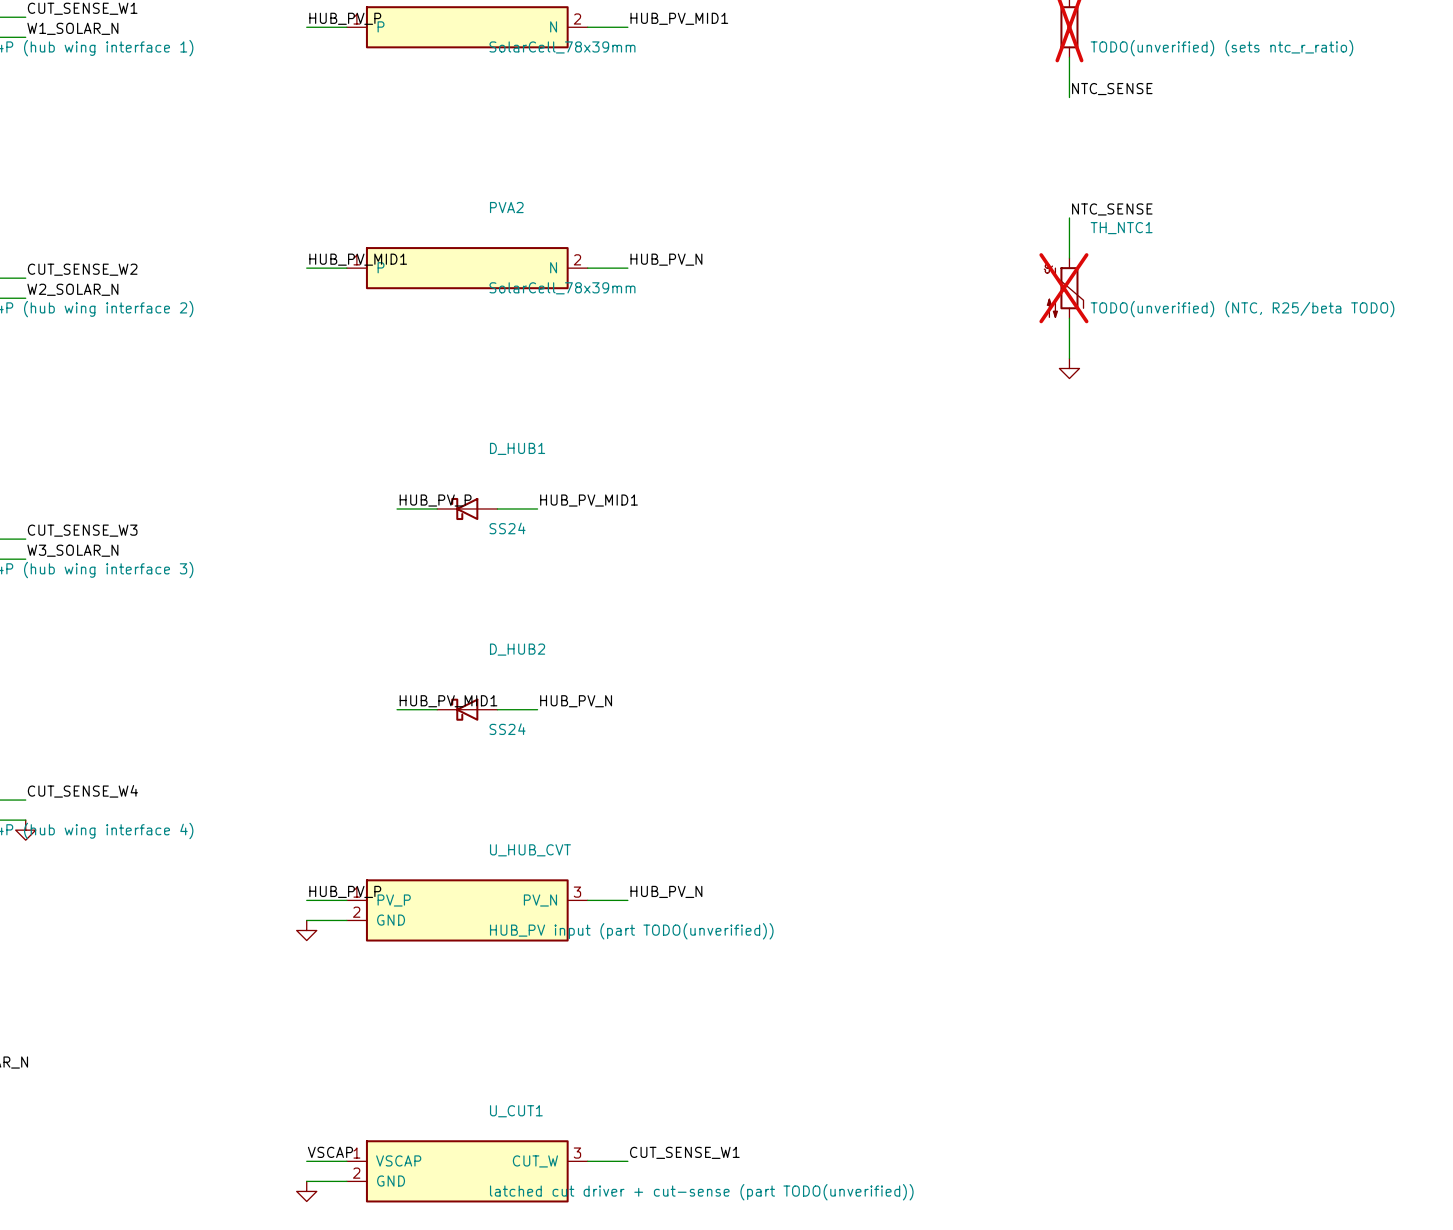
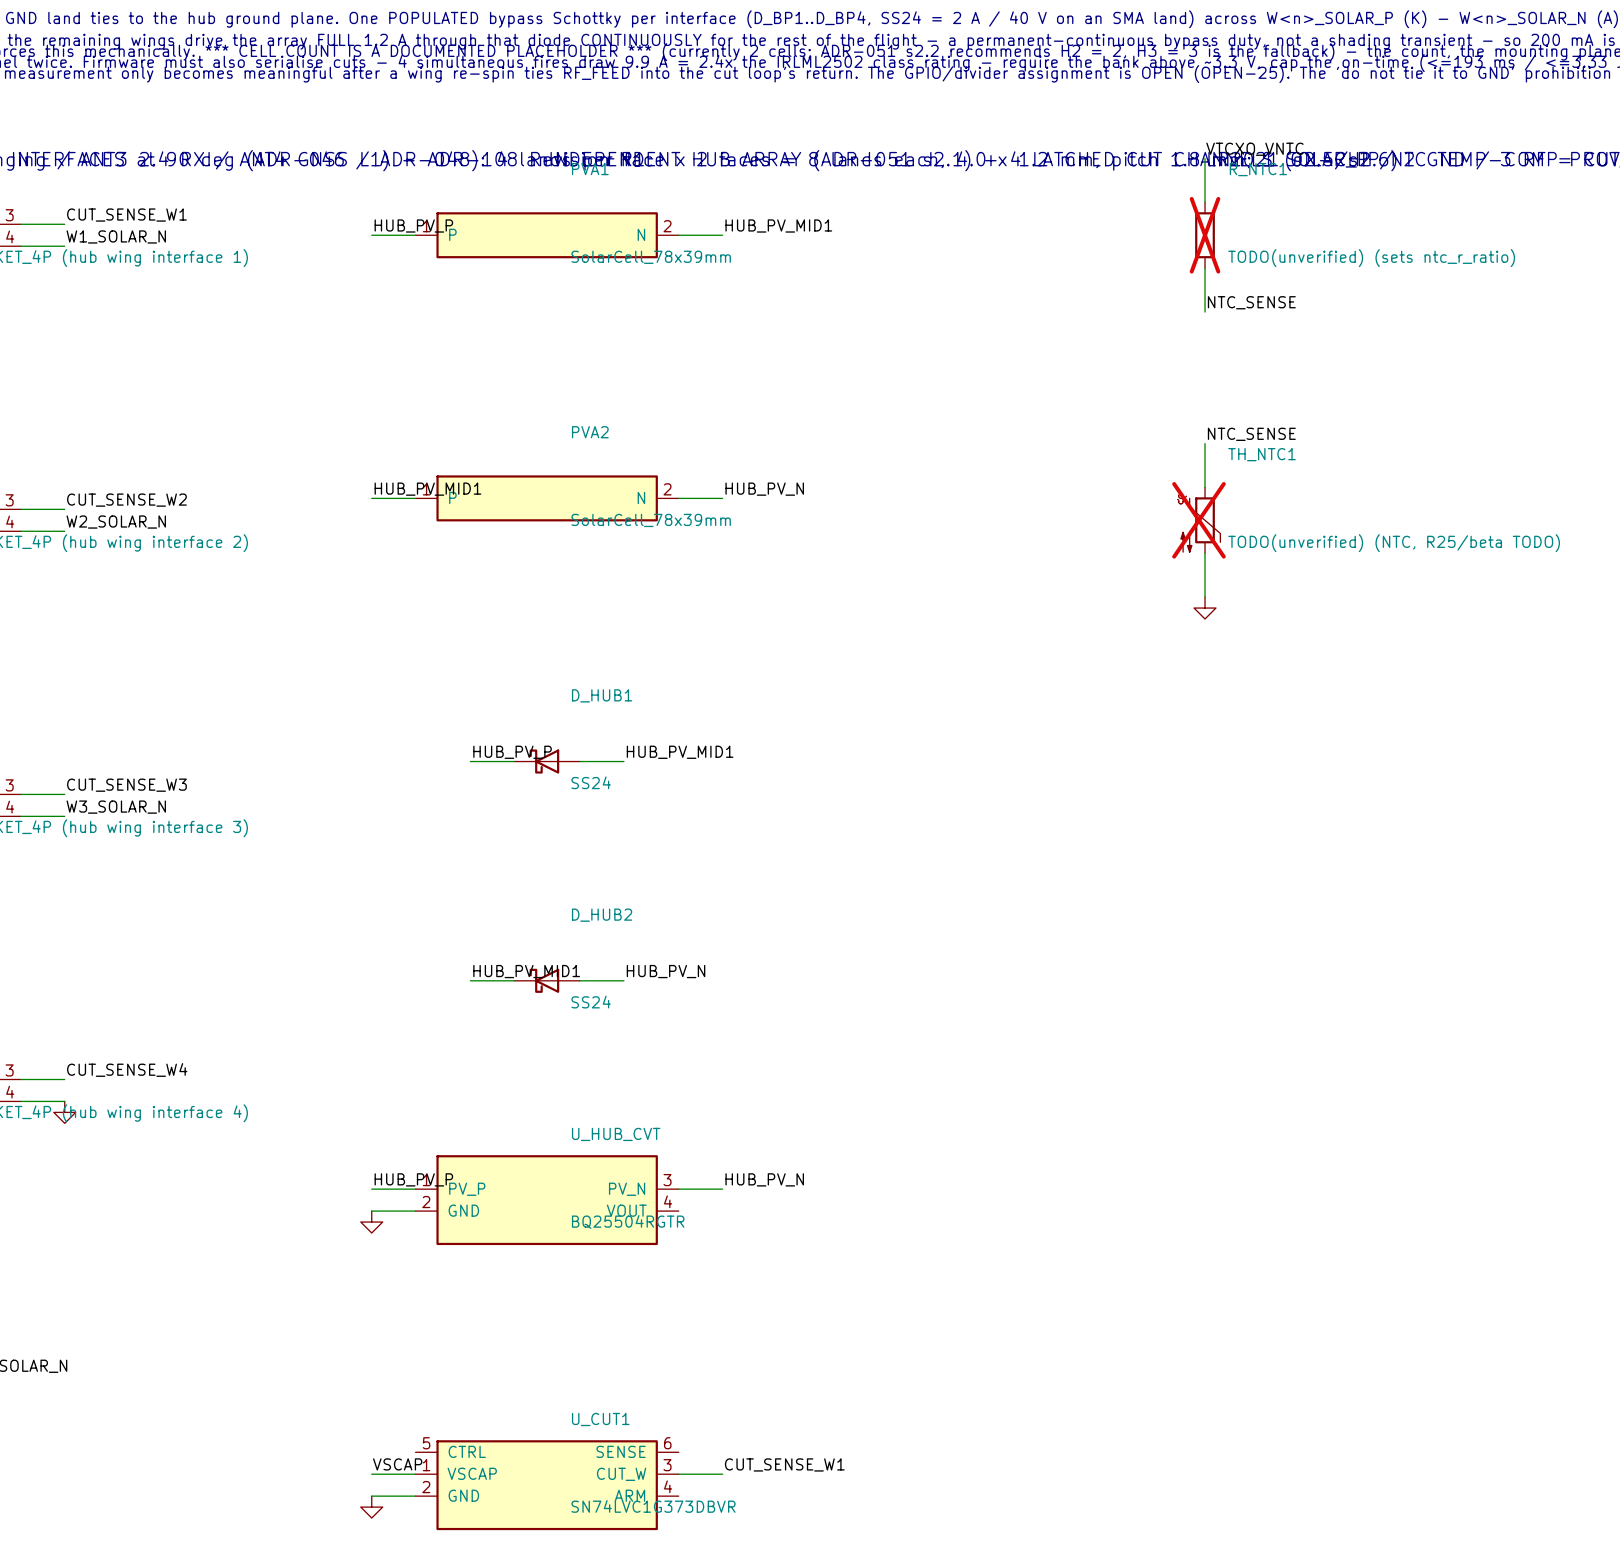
U_HUB_CVT symbol: [346, 879, 588, 942] -> [415, 1155, 679, 1246]
U_HUB_CVT value: HUB_PV input (part TODO(unverified)) (631, 931) -> BQ25504RGTR (628, 1221)
U_CUT1 symbol: [346, 1140, 588, 1203] -> [415, 1440, 679, 1531]
U_CUT1 value: latched cut driver + cut-sense (part TODO(unverified)) (701, 1192) -> SN74LVC1G373DBVR (653, 1506)

